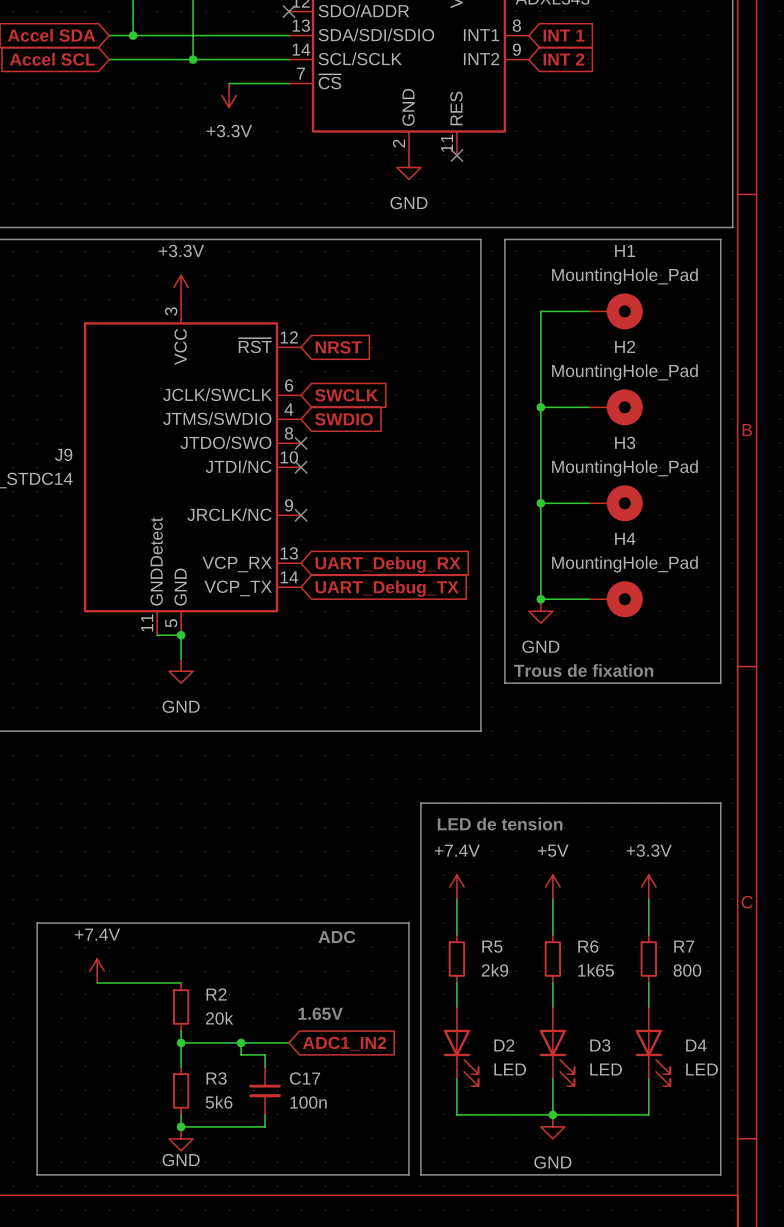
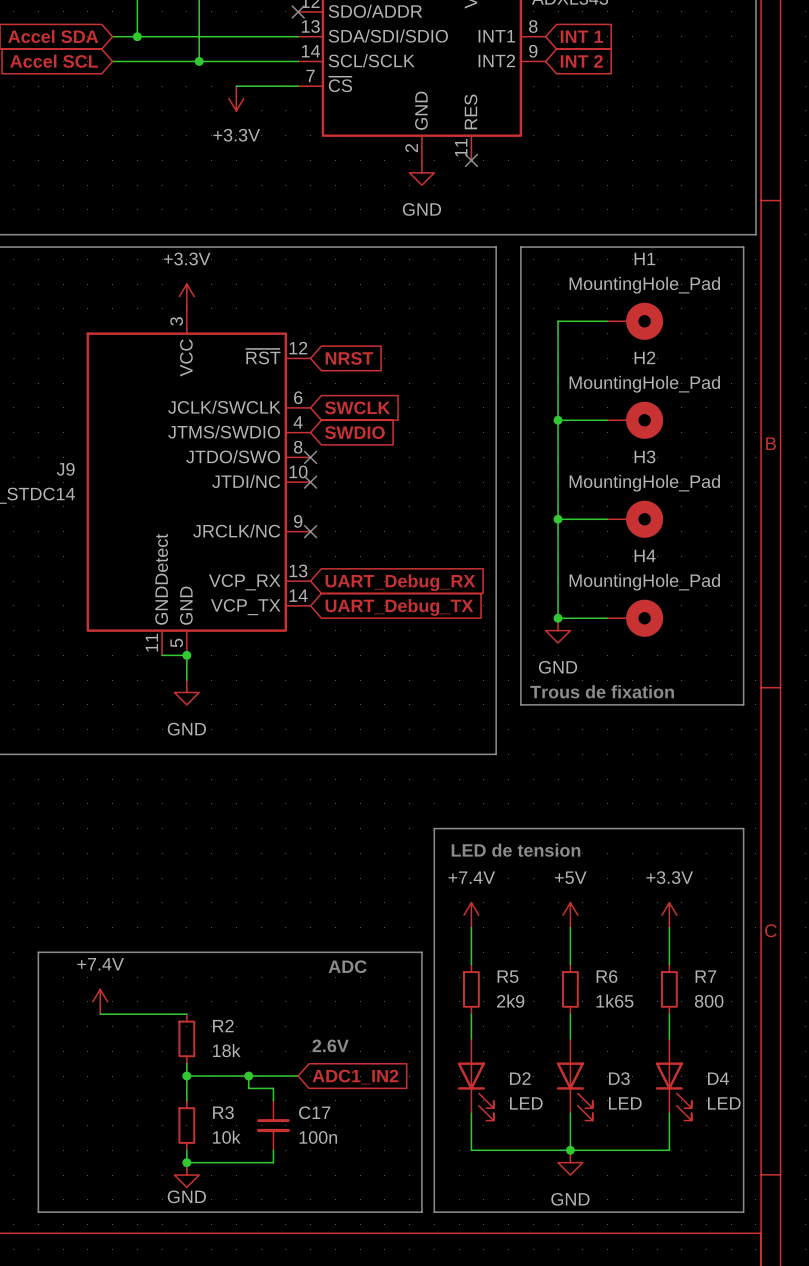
text: 1.65V (320, 1013) -> 2.6V (330, 1045)
R2 value: 20k (219, 1018) -> 18k (226, 1050)
R3 value: 5k6 (219, 1102) -> 10k (226, 1137)

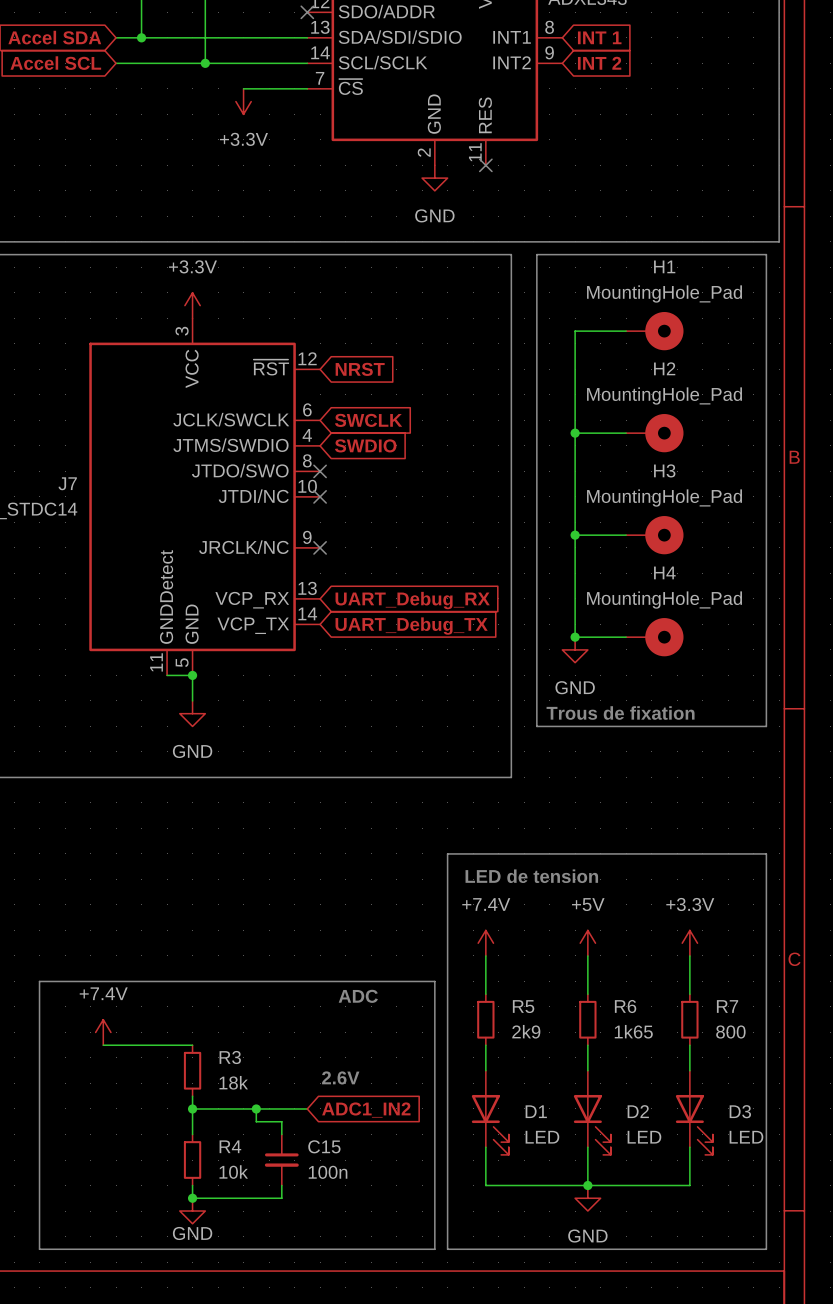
J9 name: J9 (65, 469) -> J7 (67, 483)
R2 name: R2 (223, 1026) -> R3 (230, 1057)
D2 name: D2 (520, 1078) -> D1 (536, 1111)
D3 name: D3 (619, 1078) -> D2 (638, 1111)
D4 name: D4 (718, 1078) -> D3 (740, 1111)
R3 name: R3 (223, 1112) -> R4 (230, 1146)
C17 name: C17 (314, 1112) -> C15 (324, 1146)

